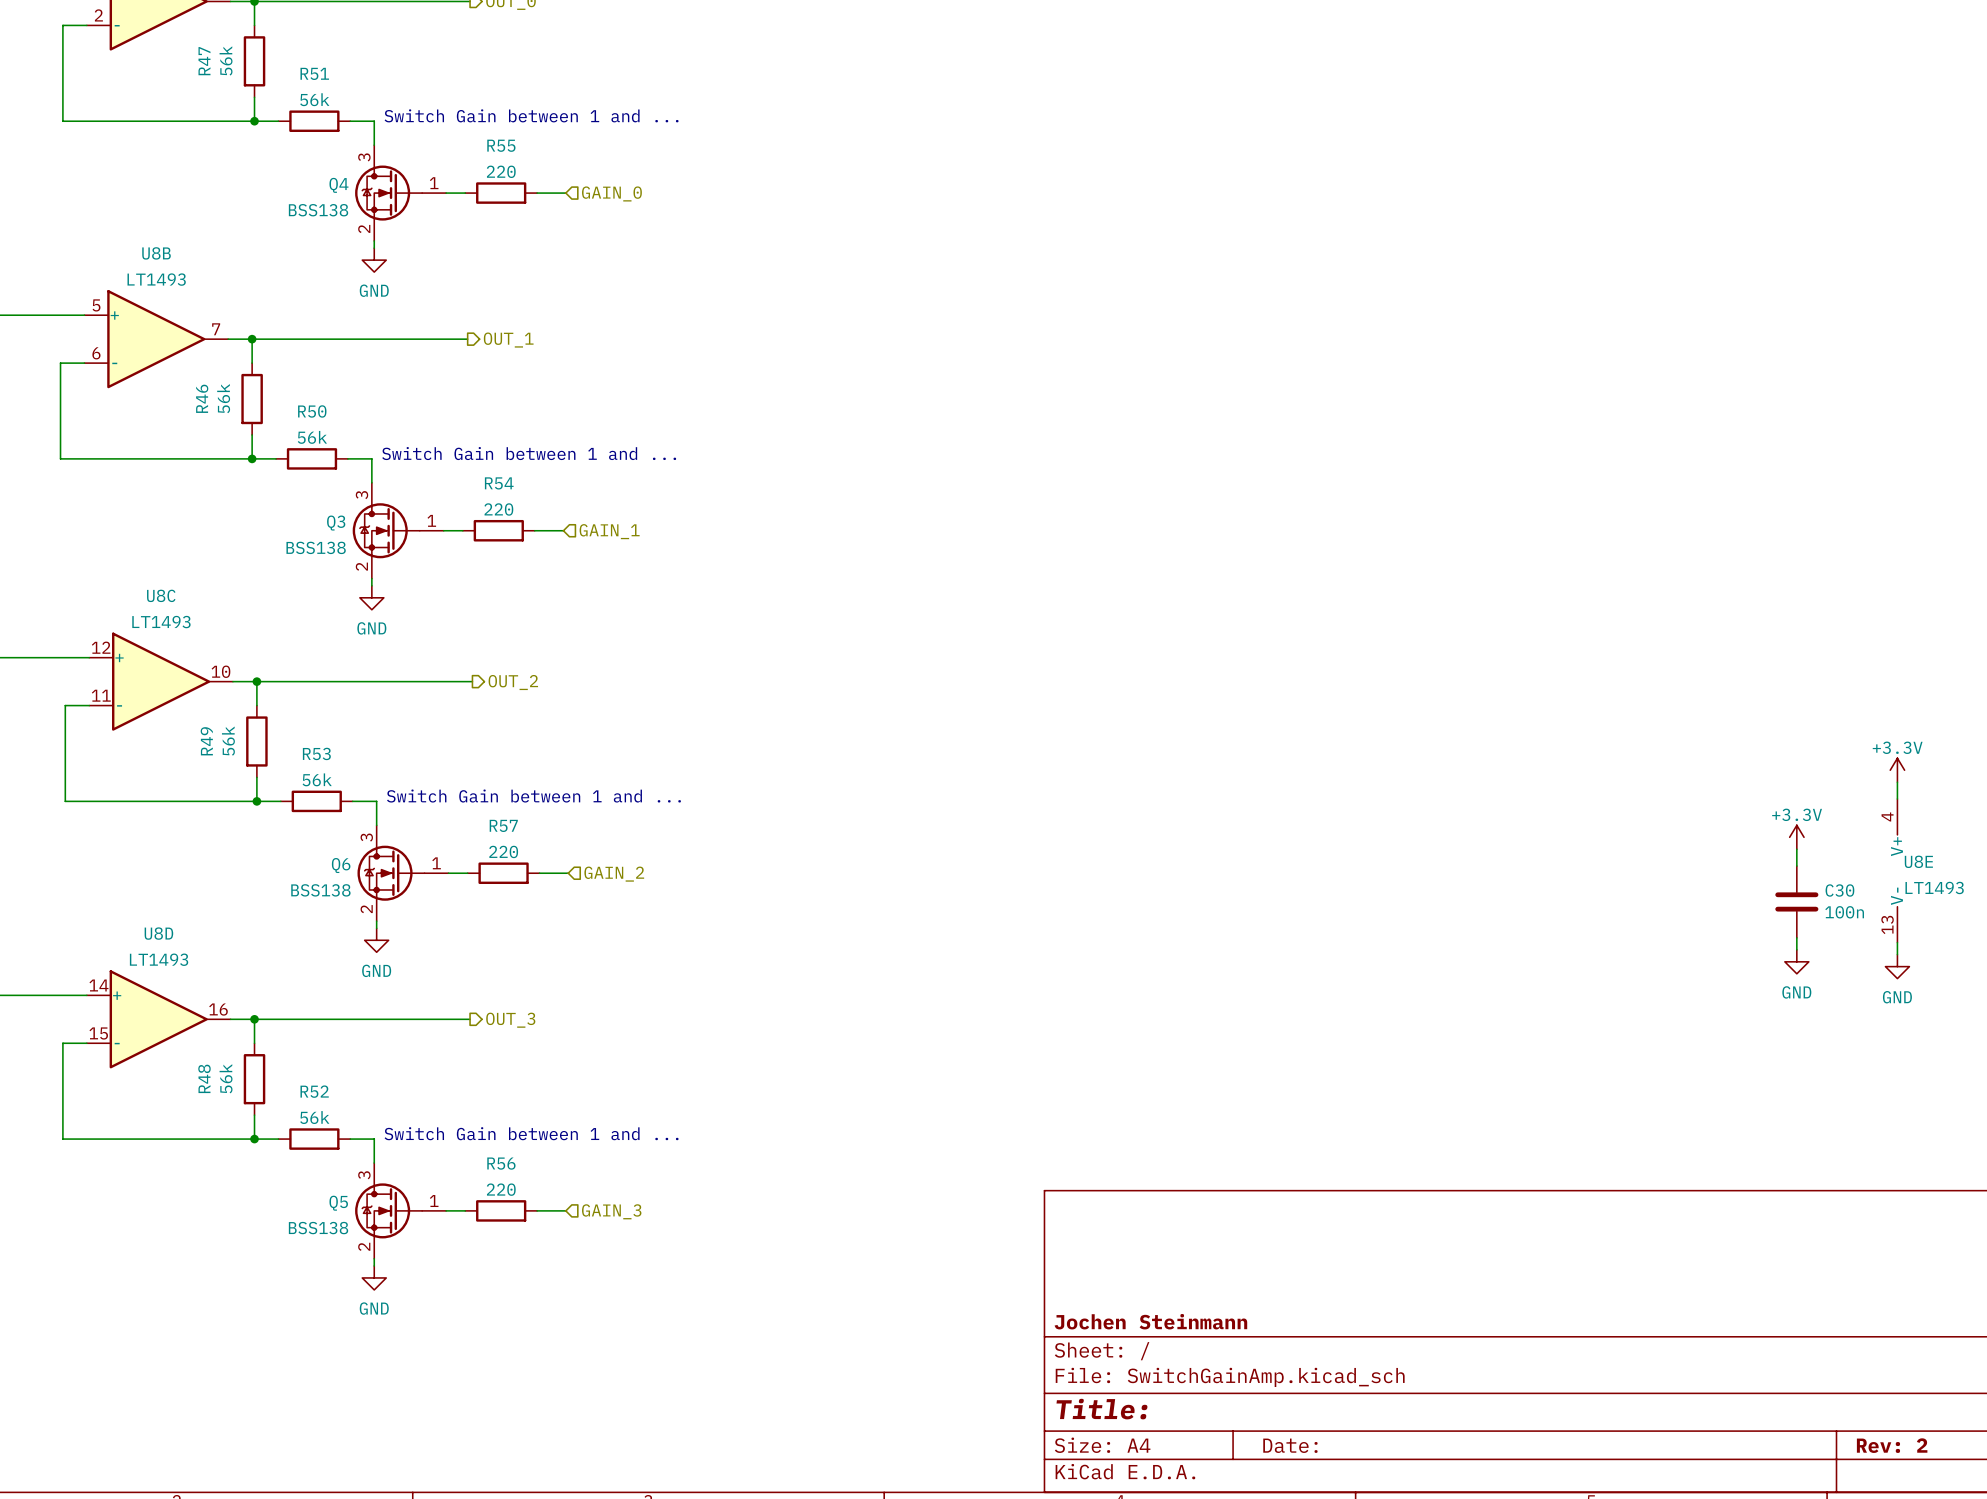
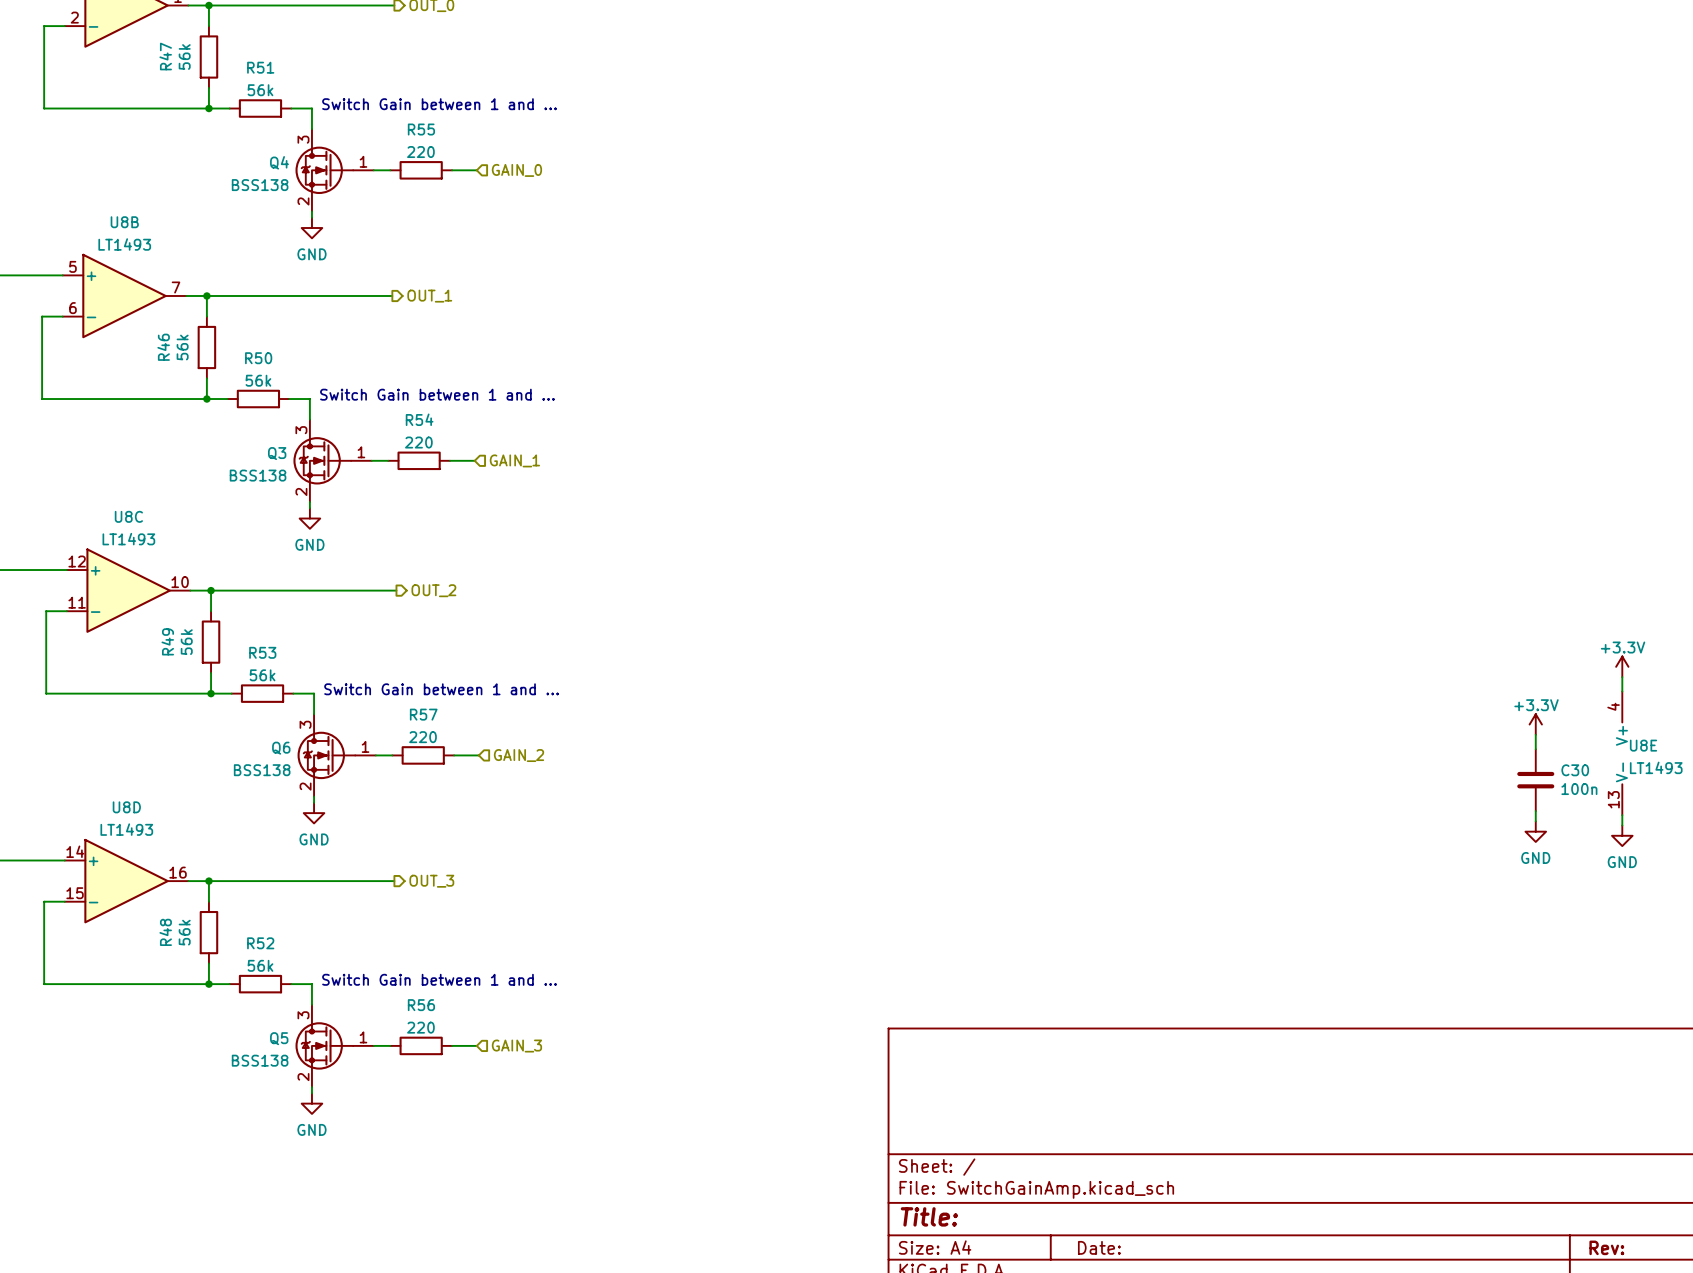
title block: Jochen Steinmann (1150, 1321) -> none
title block: Rev: 2 (1892, 1445) -> Rev: (1606, 1247)

